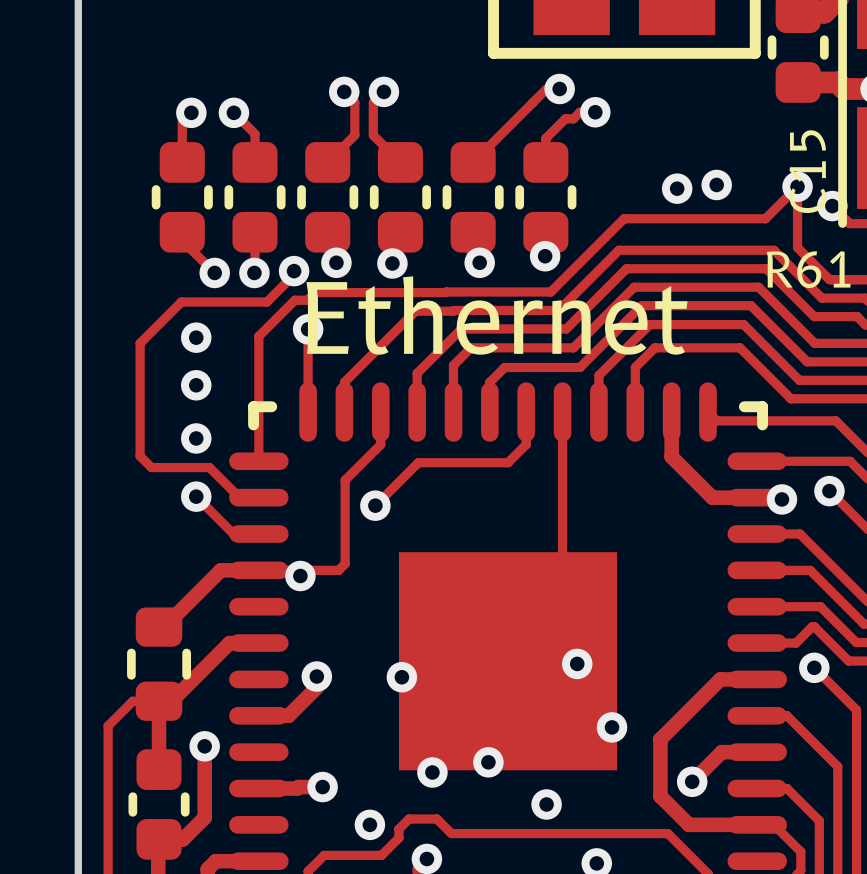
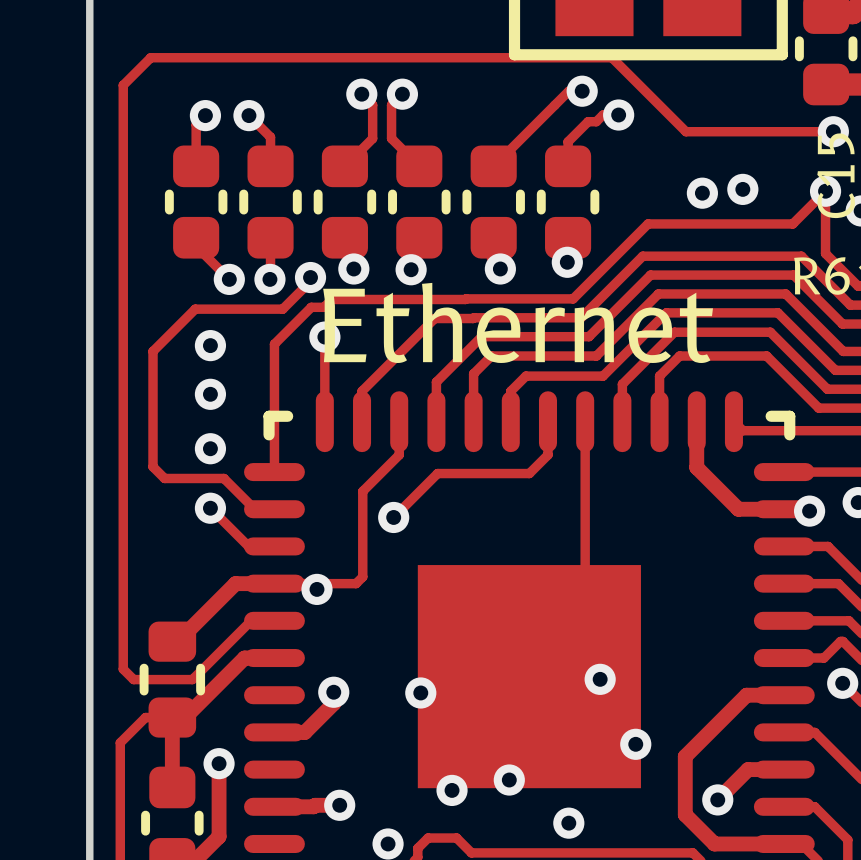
track: none -> (833, 131) (685, 131) (611, 57) (150, 57) (123, 85) (123, 669) (133, 679) (192, 679) (251, 620) (274, 620)
via: none -> (833, 131)

